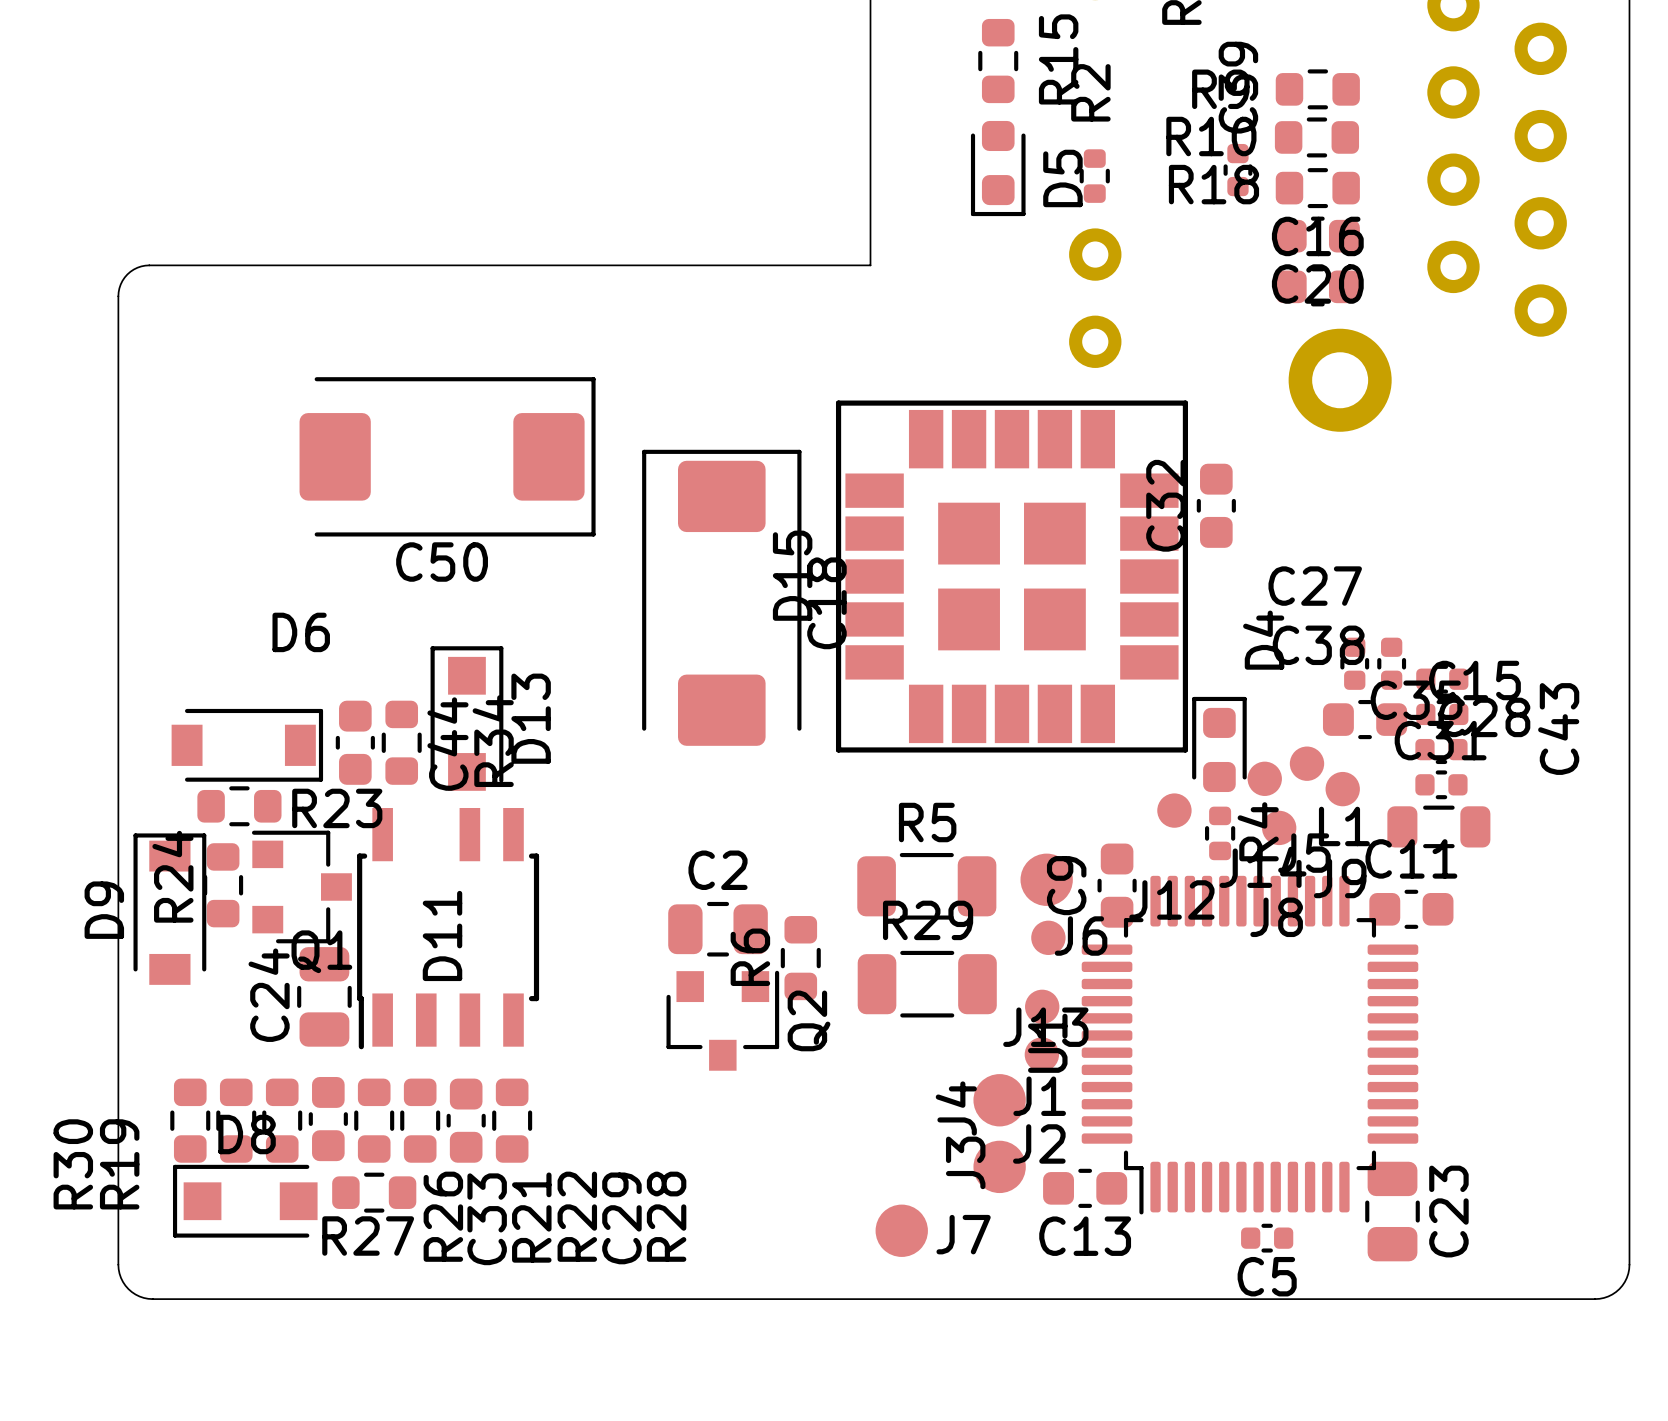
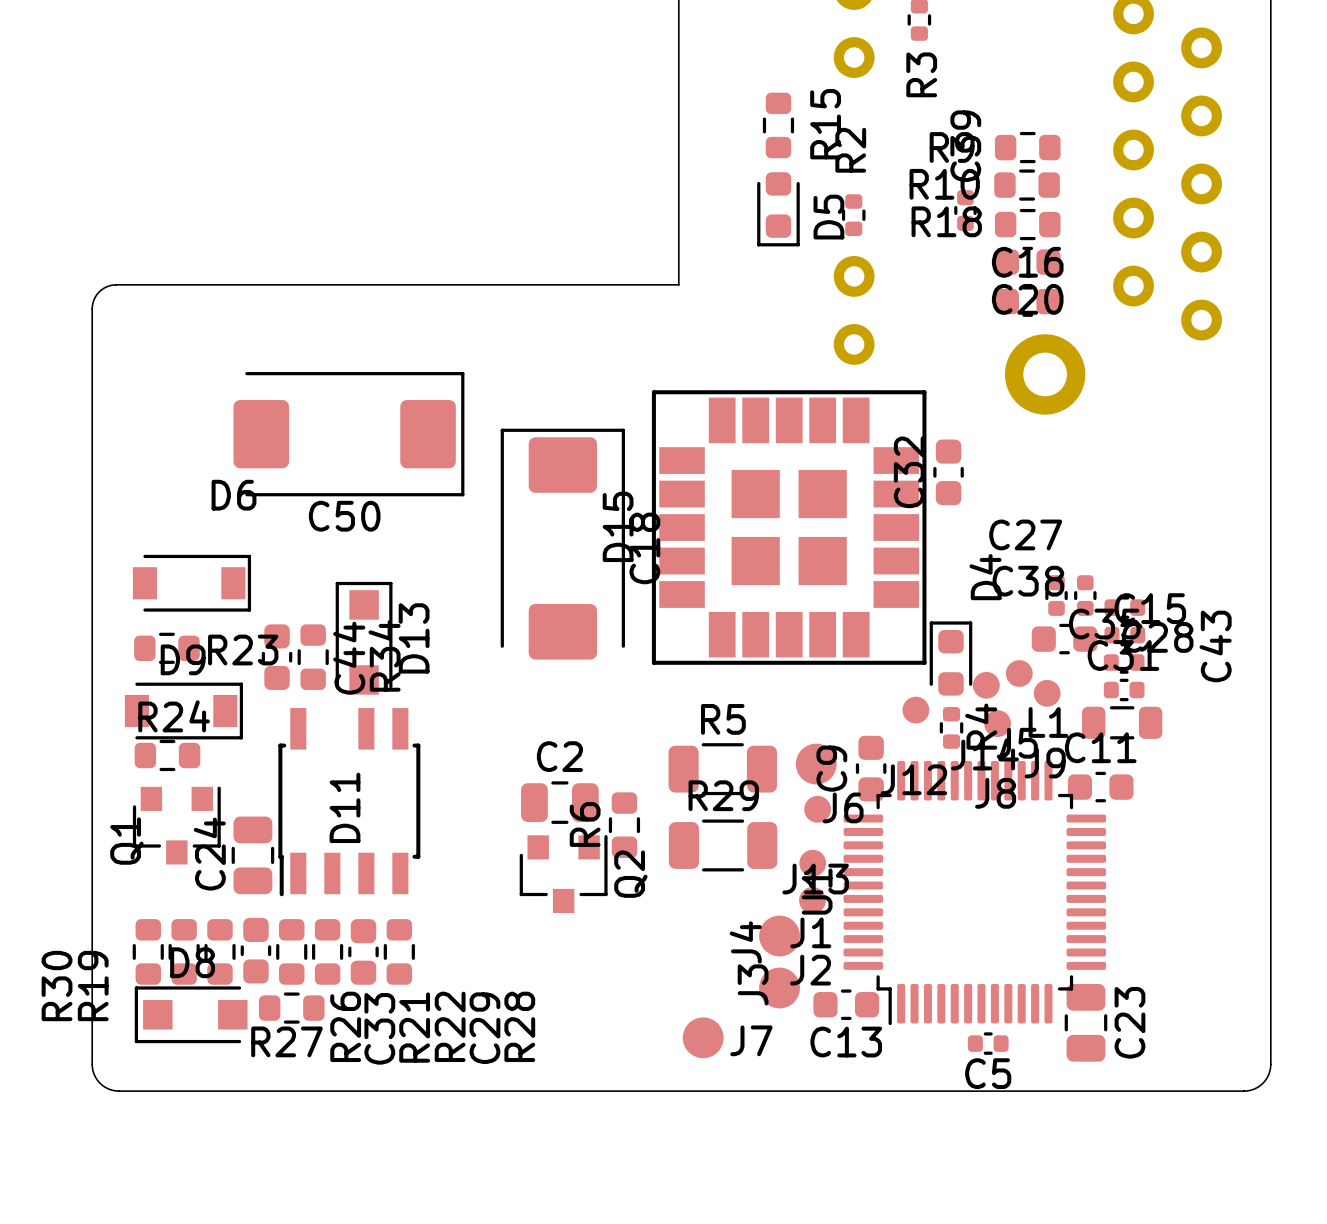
D6 position: (247, 745) -> (191, 583)
R23 position: (239, 806) -> (166, 648)
R24 rotation: 0° (223, 885) -> 90° clockwise (167, 755)
Q1 rotation: 0° (301, 886) -> 90° clockwise (176, 825)
Q1 position: (301, 886) -> (176, 825)
D9 rotation: 0° (169, 909) -> 90° clockwise (183, 711)
D9 position: (169, 909) -> (183, 711)

